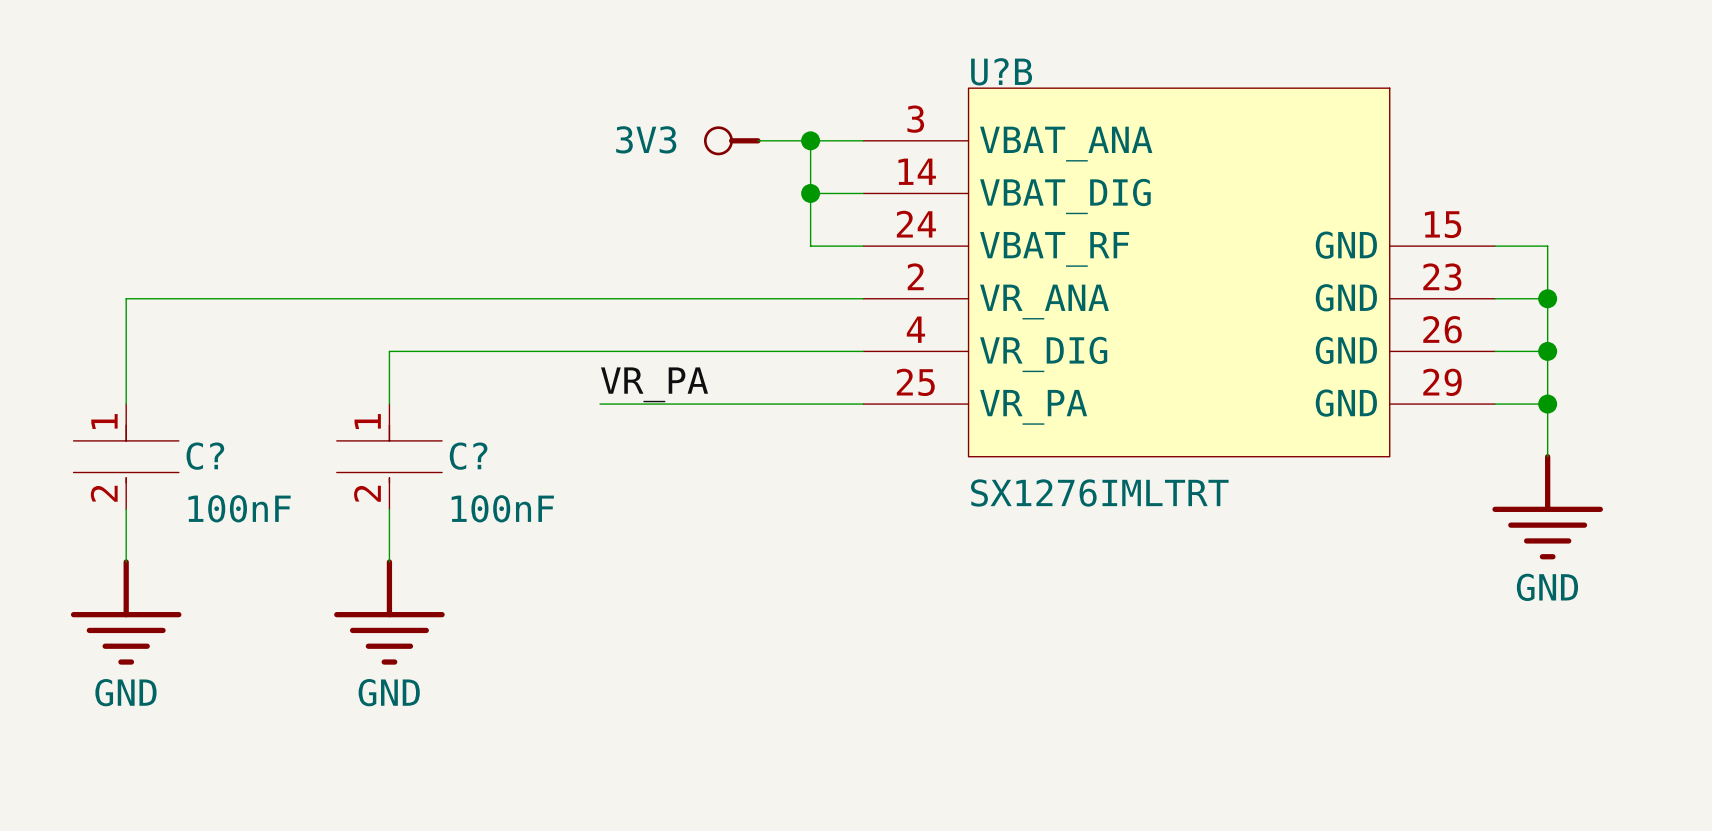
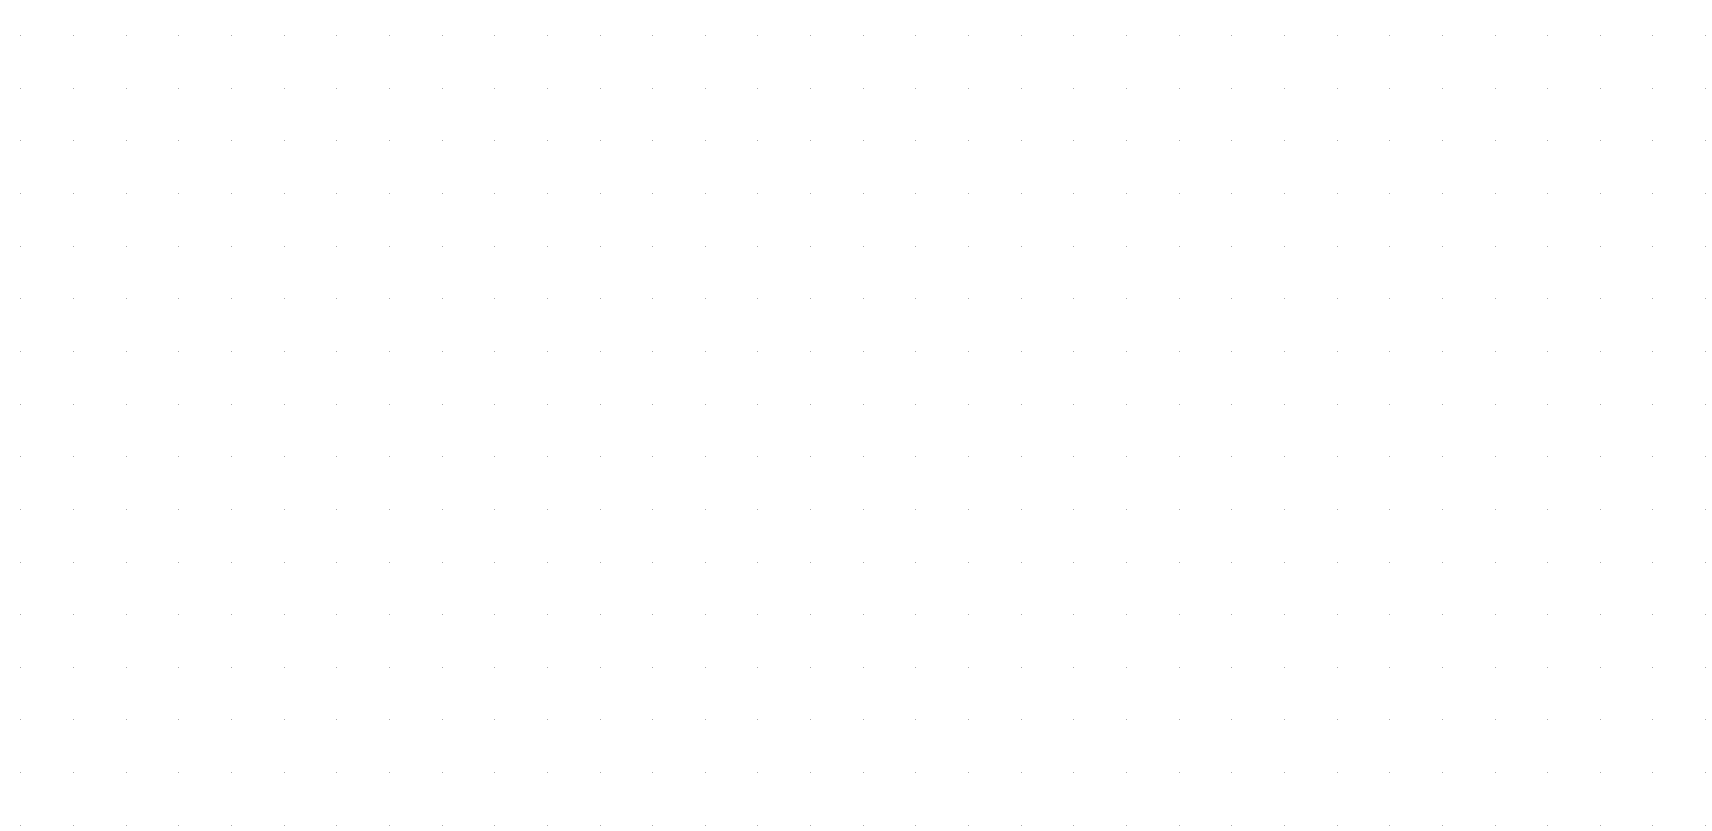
power symbol: 3V3 (732, 140) -> none
wire: (757, 140) (863, 140) -> none
wire: (810, 140) (810, 246) (863, 246) -> none
junction: (810, 140) -> none
wire: (810, 193) (863, 193) -> none
junction: (810, 193) -> none
wire: (1495, 246) (1547, 246) (1547, 456) -> none
U?B: SX1276IMLTRT (1179, 272) -> none
wire: (863, 298) (126, 298) (126, 404) -> none
wire: (1495, 298) (1547, 298) -> none
junction: (1547, 298) -> none
wire: (863, 351) (389, 351) (389, 404) -> none
wire: (1495, 351) (1547, 351) -> none
junction: (1547, 351) -> none
label: VR_PA (654, 384) -> none
wire: (600, 404) (863, 404) -> none
wire: (1495, 404) (1547, 404) -> none
junction: (1547, 404) -> none
C?: 100nF (126, 456) -> none
C?: 100nF (389, 456) -> none
power symbol: GND (1547, 506) -> none
wire: (126, 509) (126, 562) -> none
wire: (389, 509) (389, 562) -> none
power symbol: GND (126, 612) -> none
power symbol: GND (389, 612) -> none

